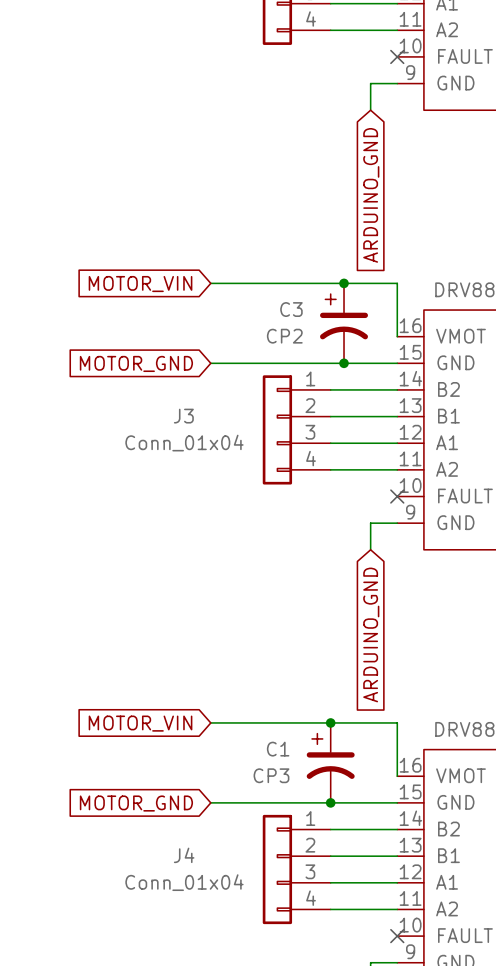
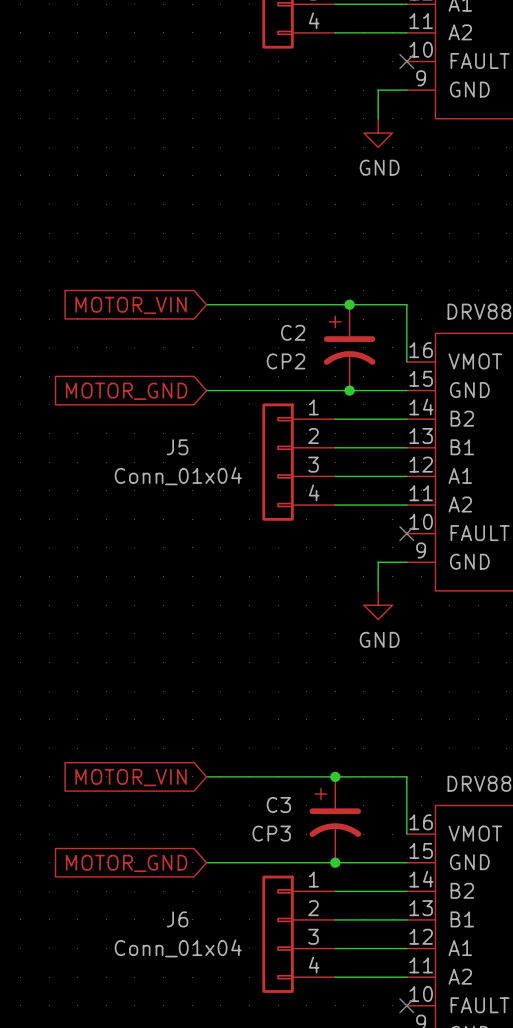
power symbol: none -> GND (378, 133)
global label: ARDUINO_GND (371, 195) -> none
C3 name: C3 (291, 309) -> C2 (293, 332)
J3 name: J3 (183, 416) -> J5 (177, 447)
power symbol: none -> GND (378, 605)
global label: ARDUINO_GND (371, 634) -> none
C1 name: C1 (278, 749) -> C3 (278, 804)
J4 name: J4 (184, 855) -> J6 (177, 919)

